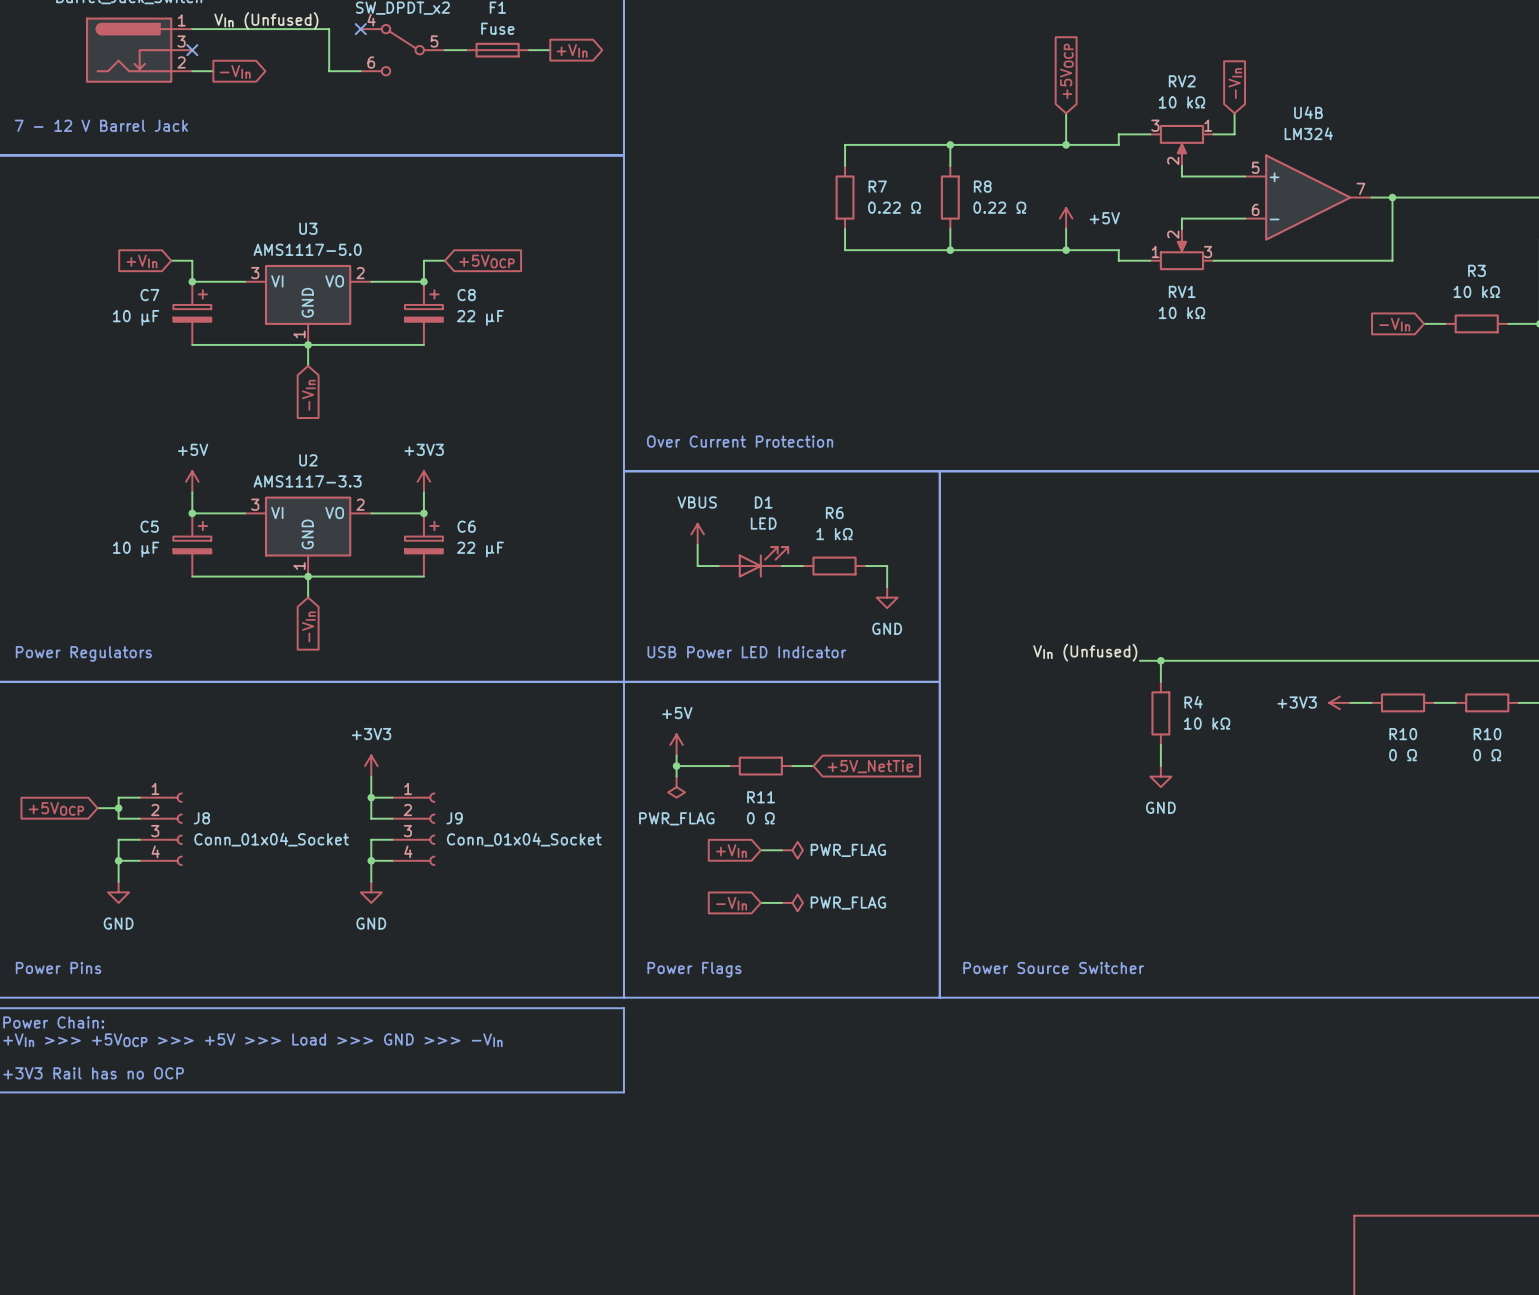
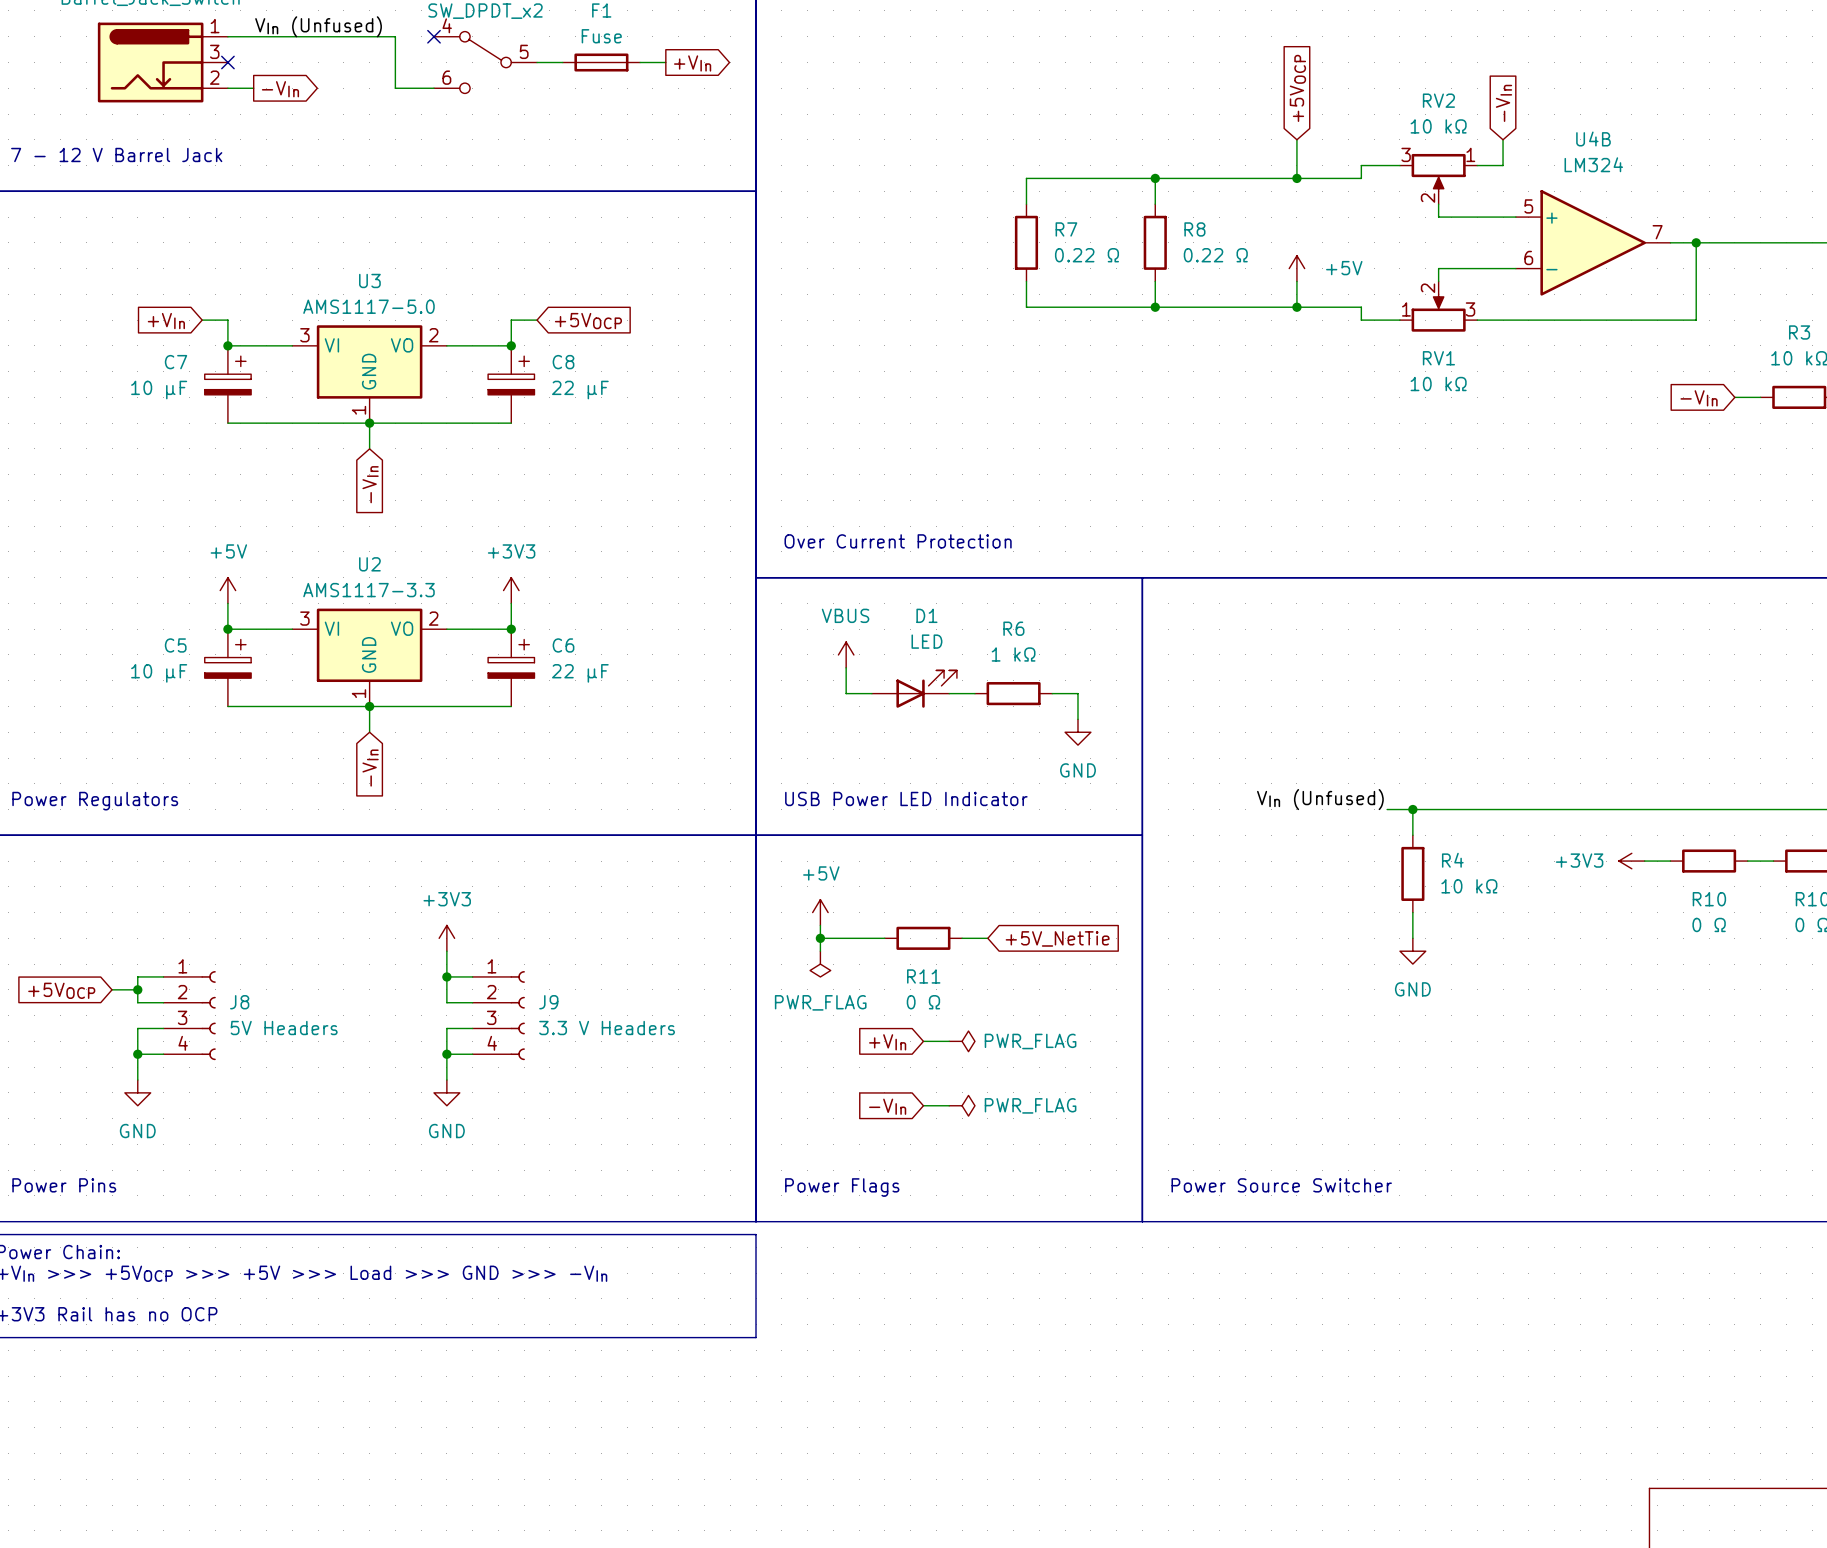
J8 value: Conn_01x04_Socket (271, 839) -> 5V Headers (284, 1028)
J9 value: Conn_01x04_Socket (524, 839) -> 3.3 V Headers (607, 1028)

